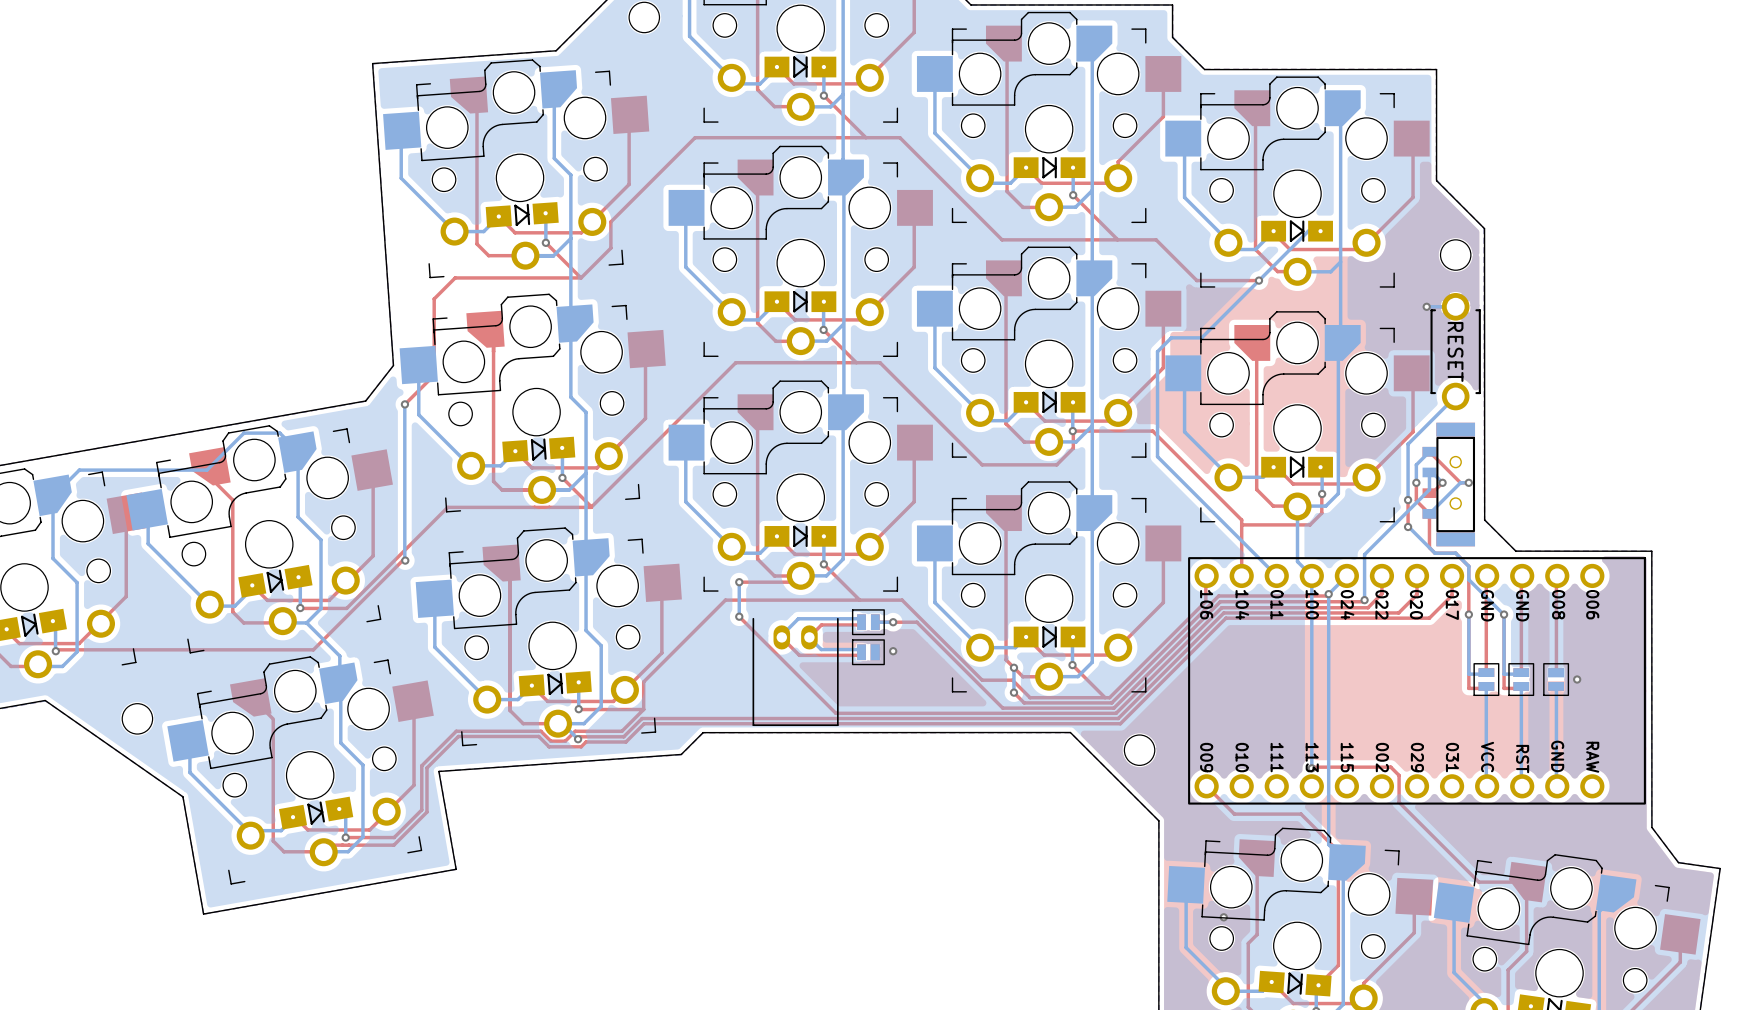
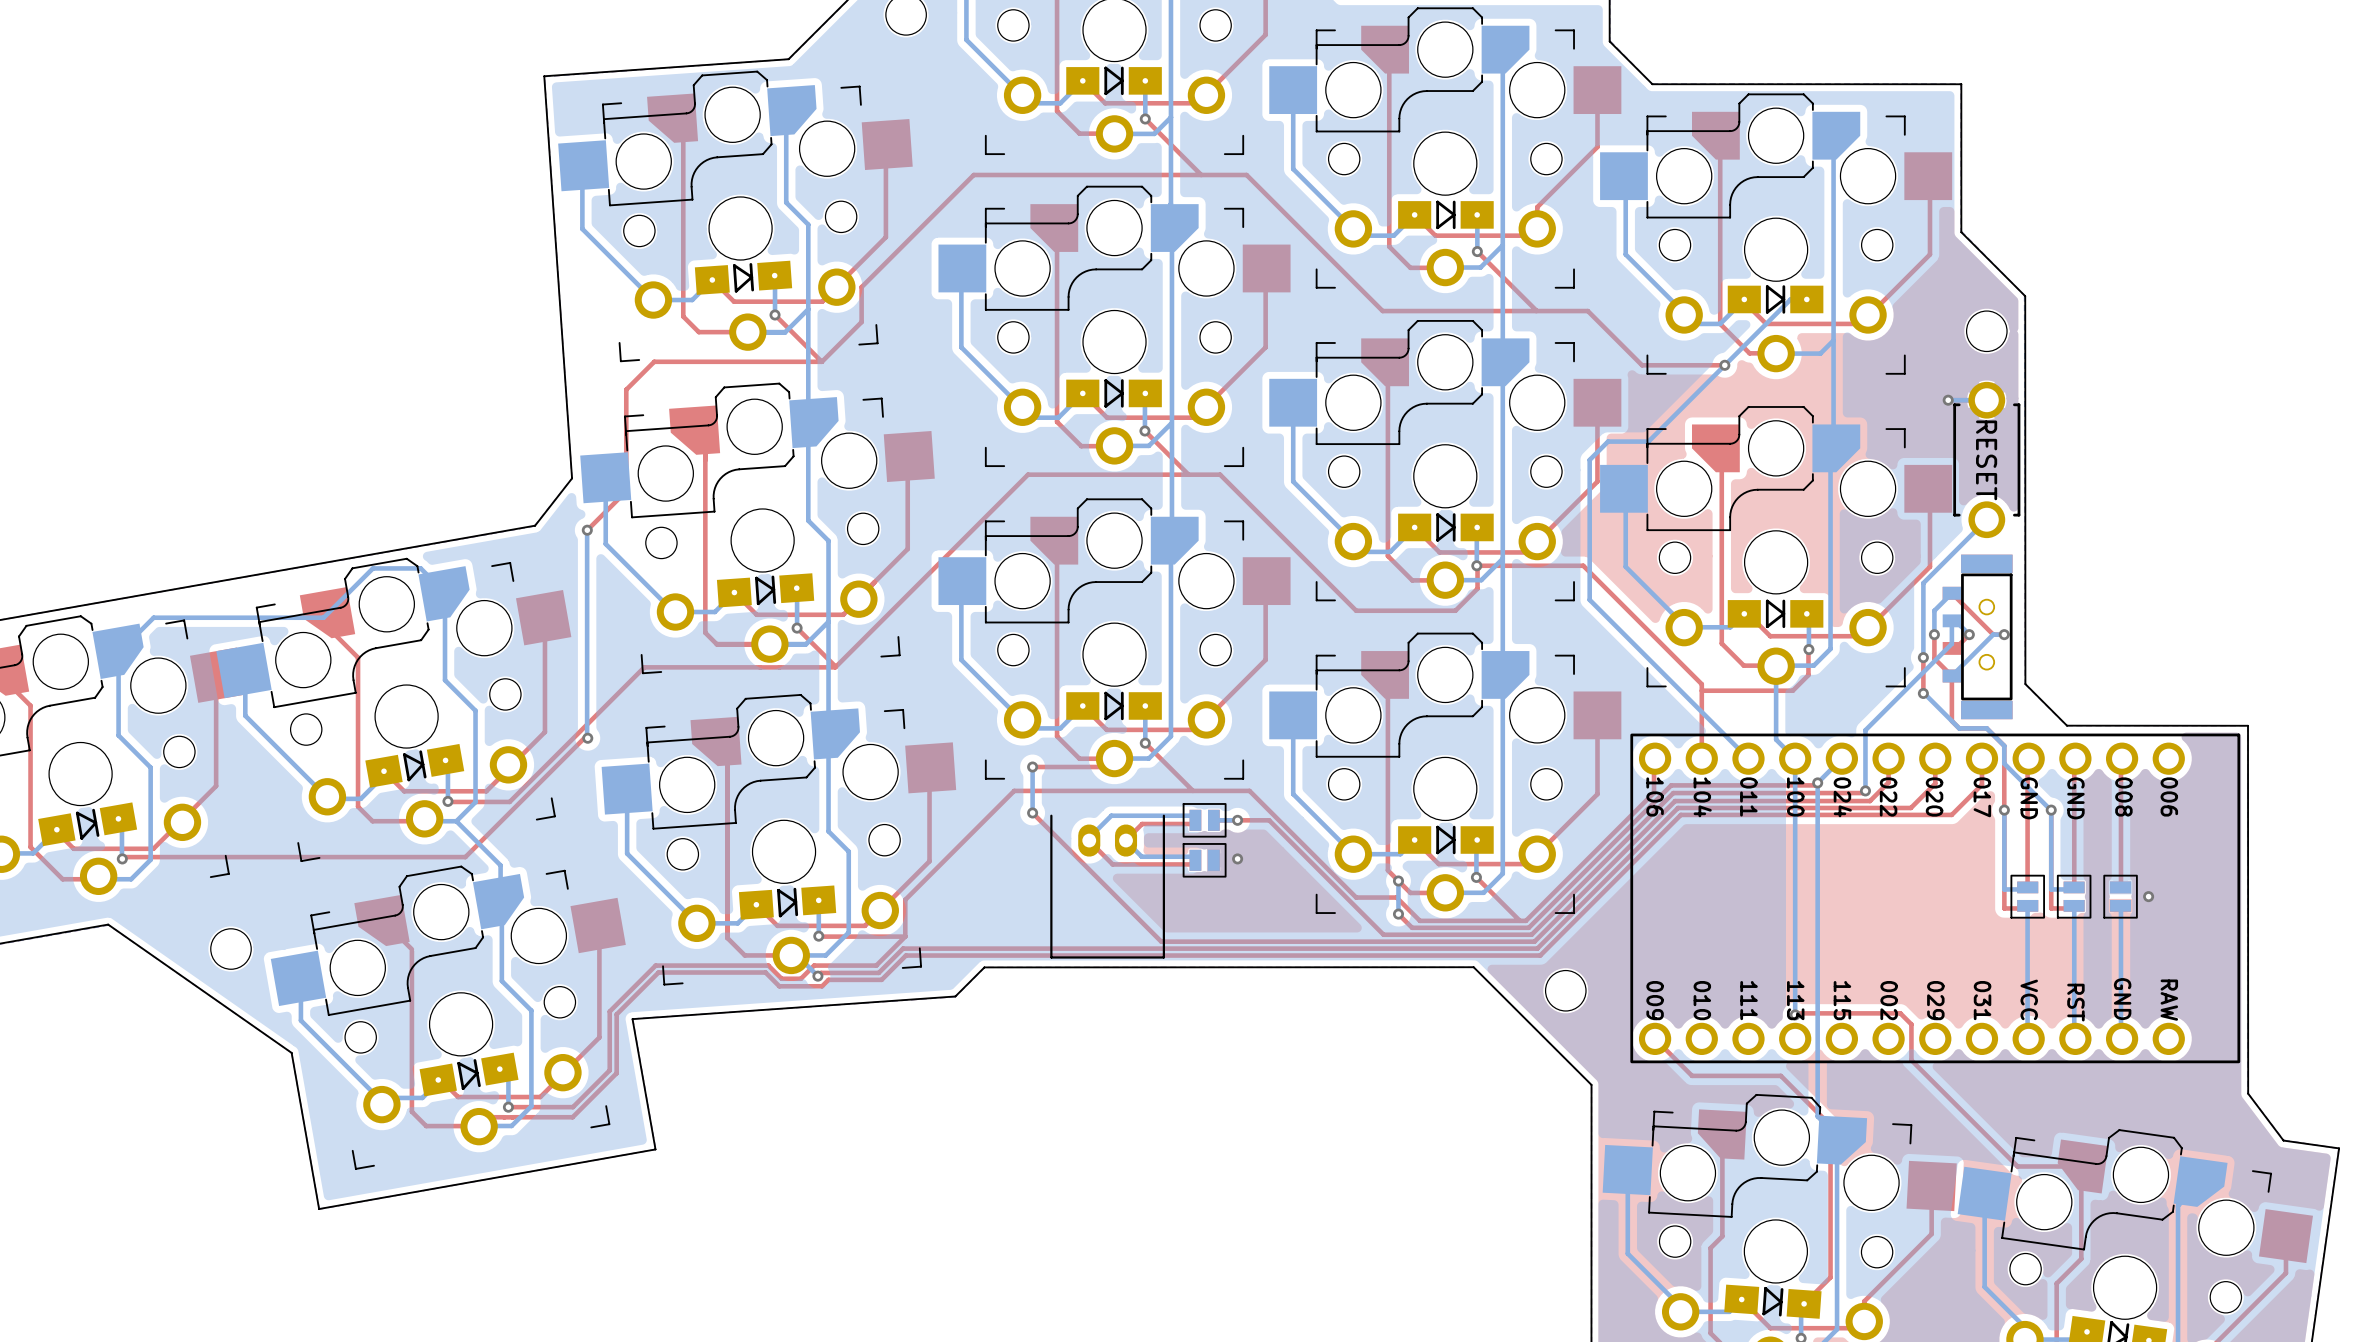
via: (1223, 917) -> none

